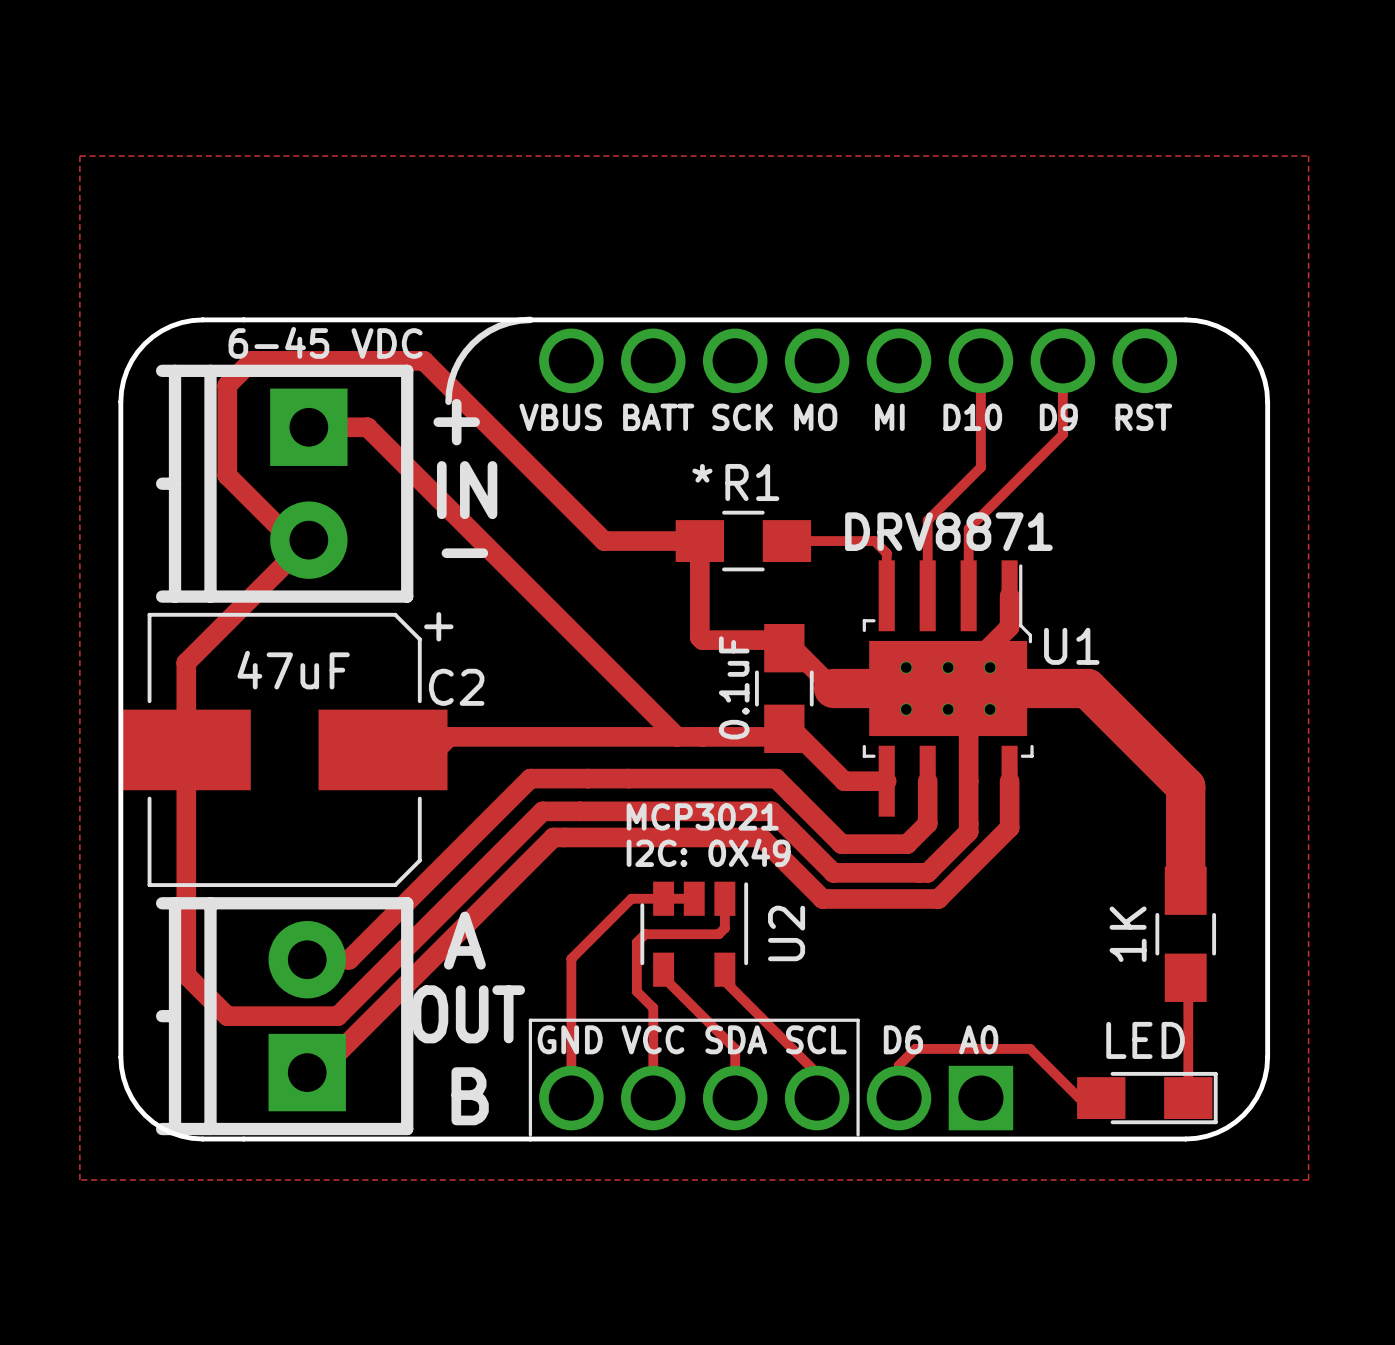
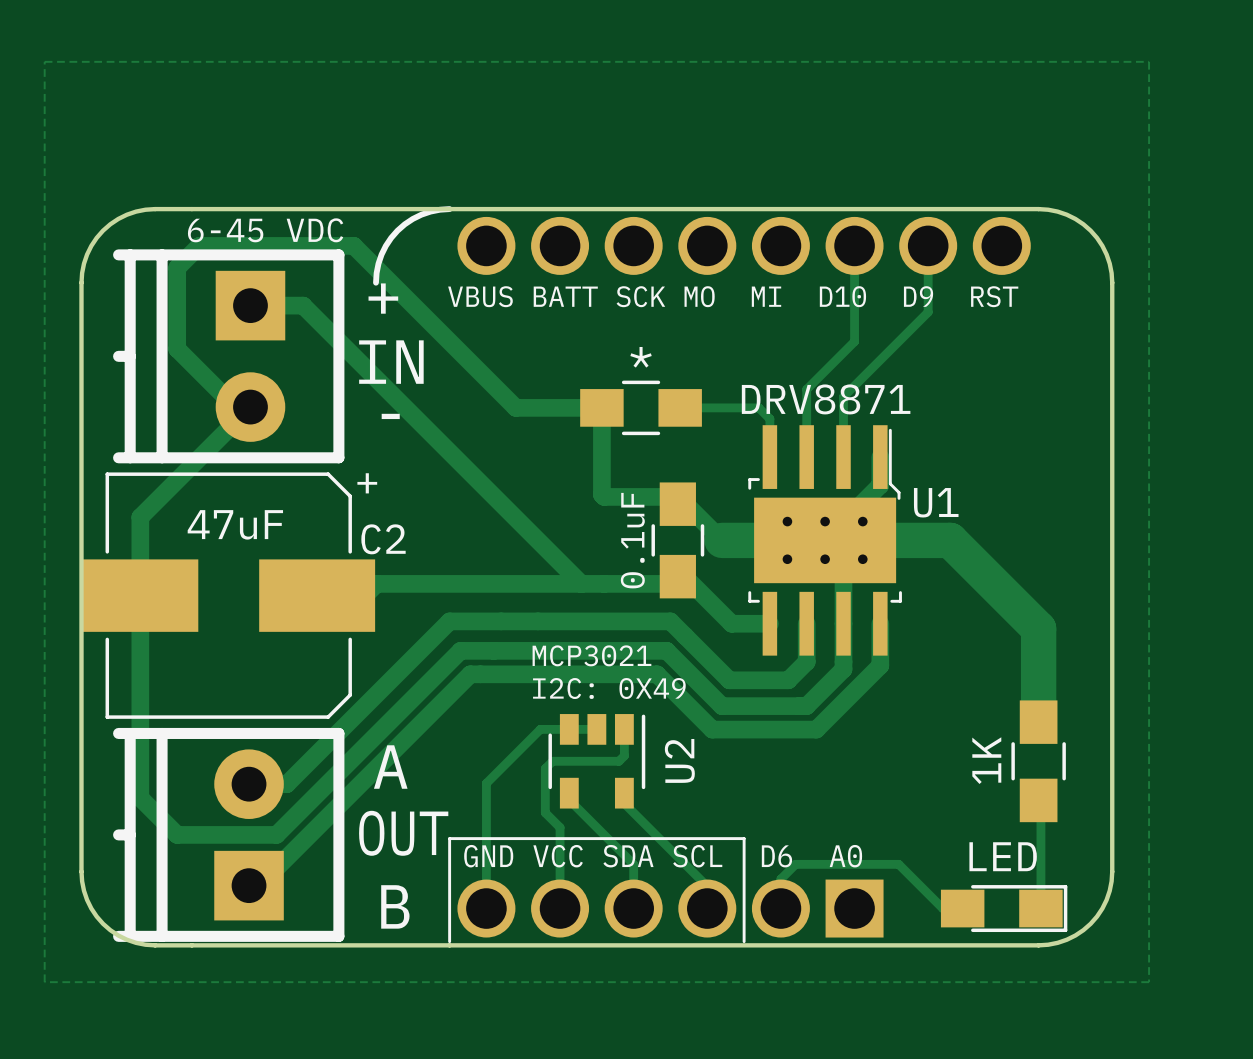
R1 value position: * (702, 473) -> * (641, 357)
R1 name: R1 (752, 482) -> none

